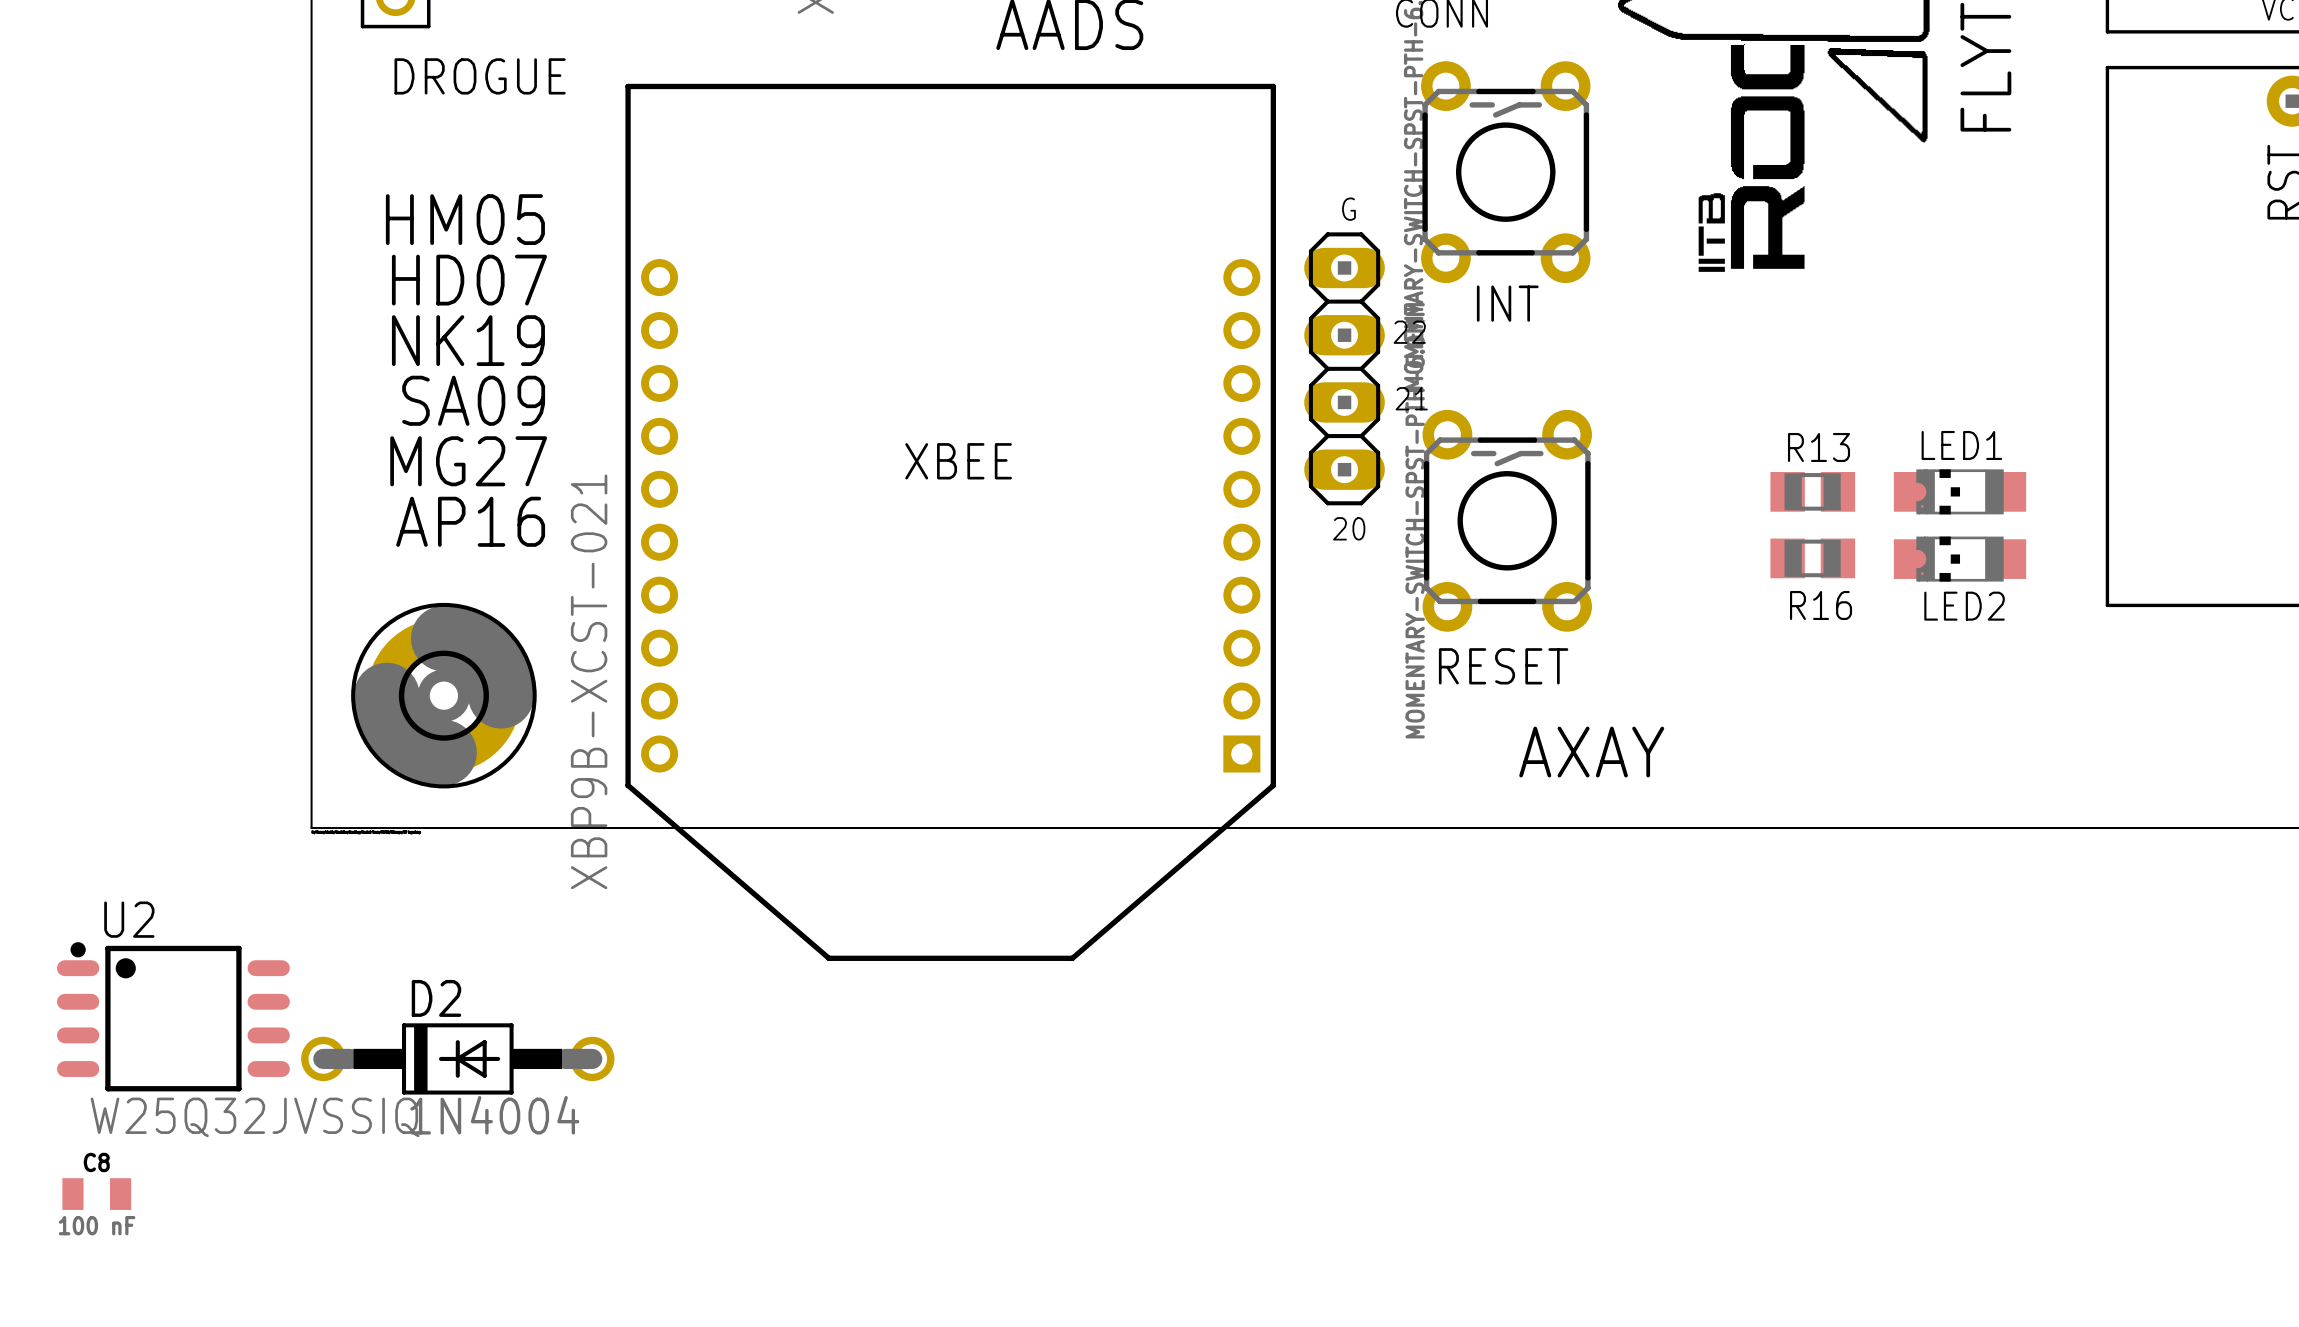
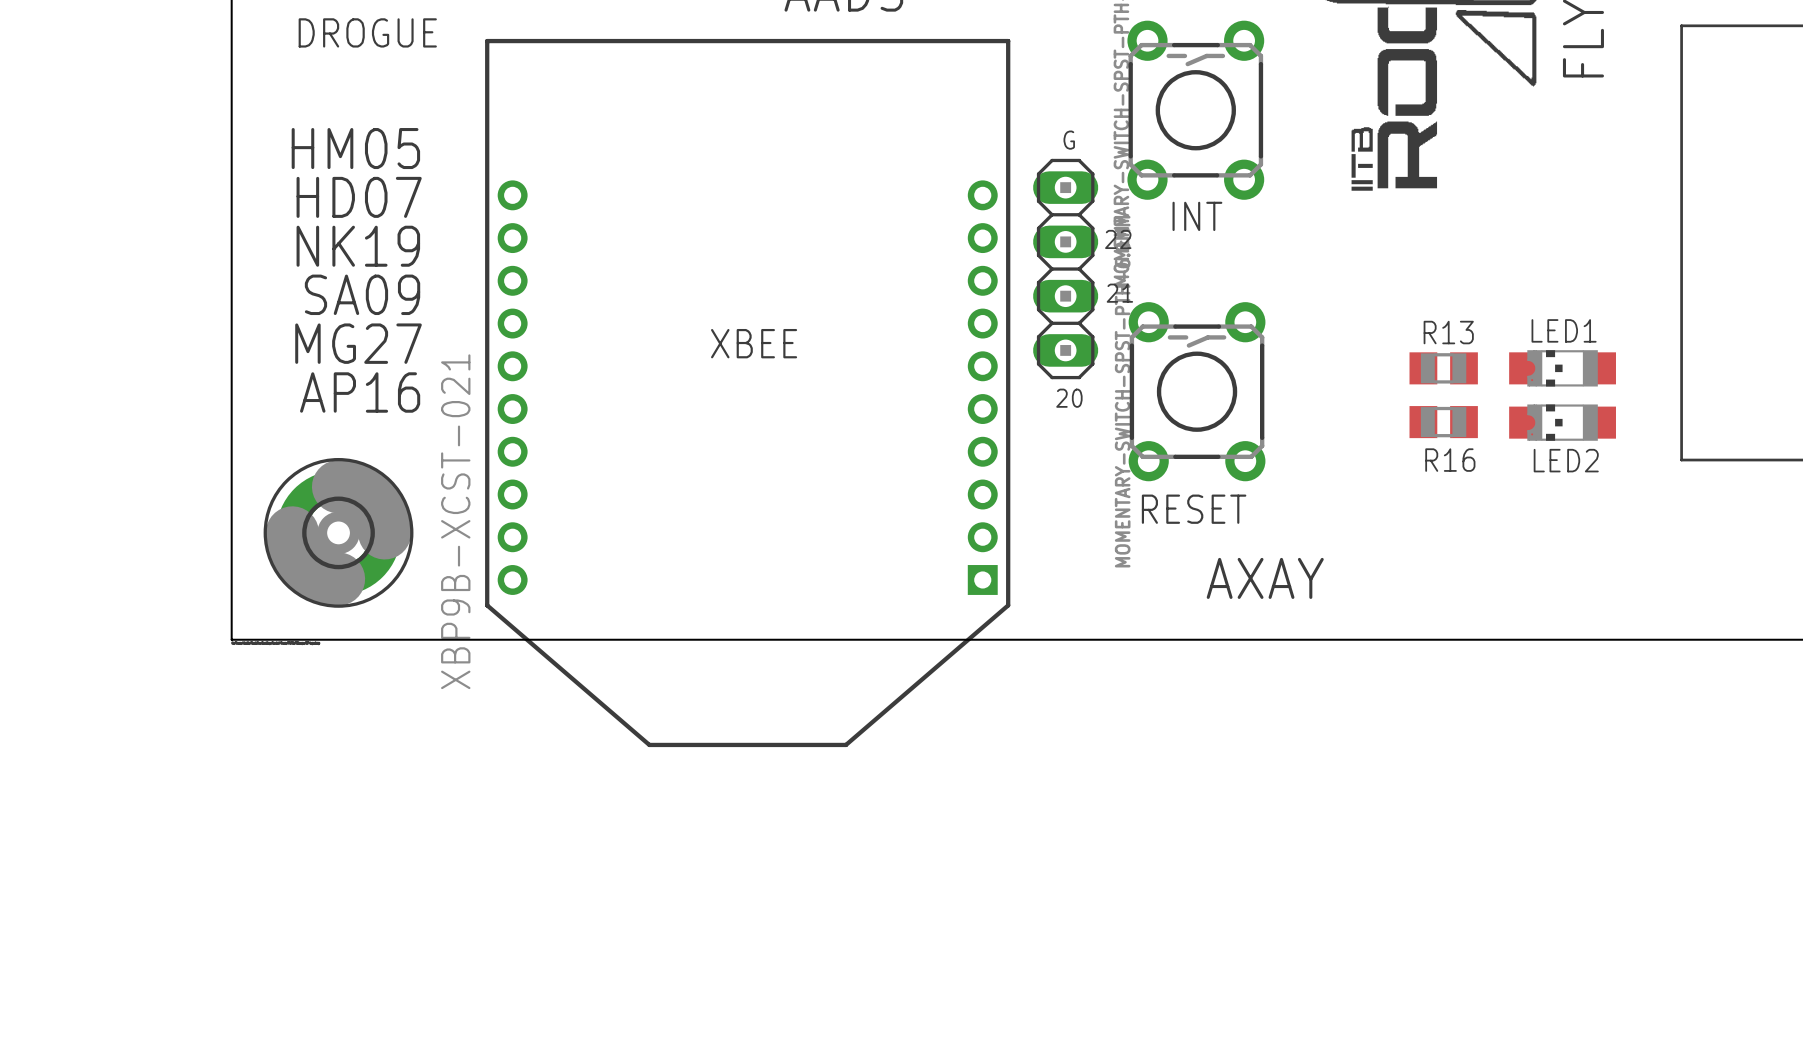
U2: W25Q32JVSSIQ (173, 1016) -> none
D2: 1N4004 (457, 1058) -> none
C8: 100 nF (96, 1194) -> none

